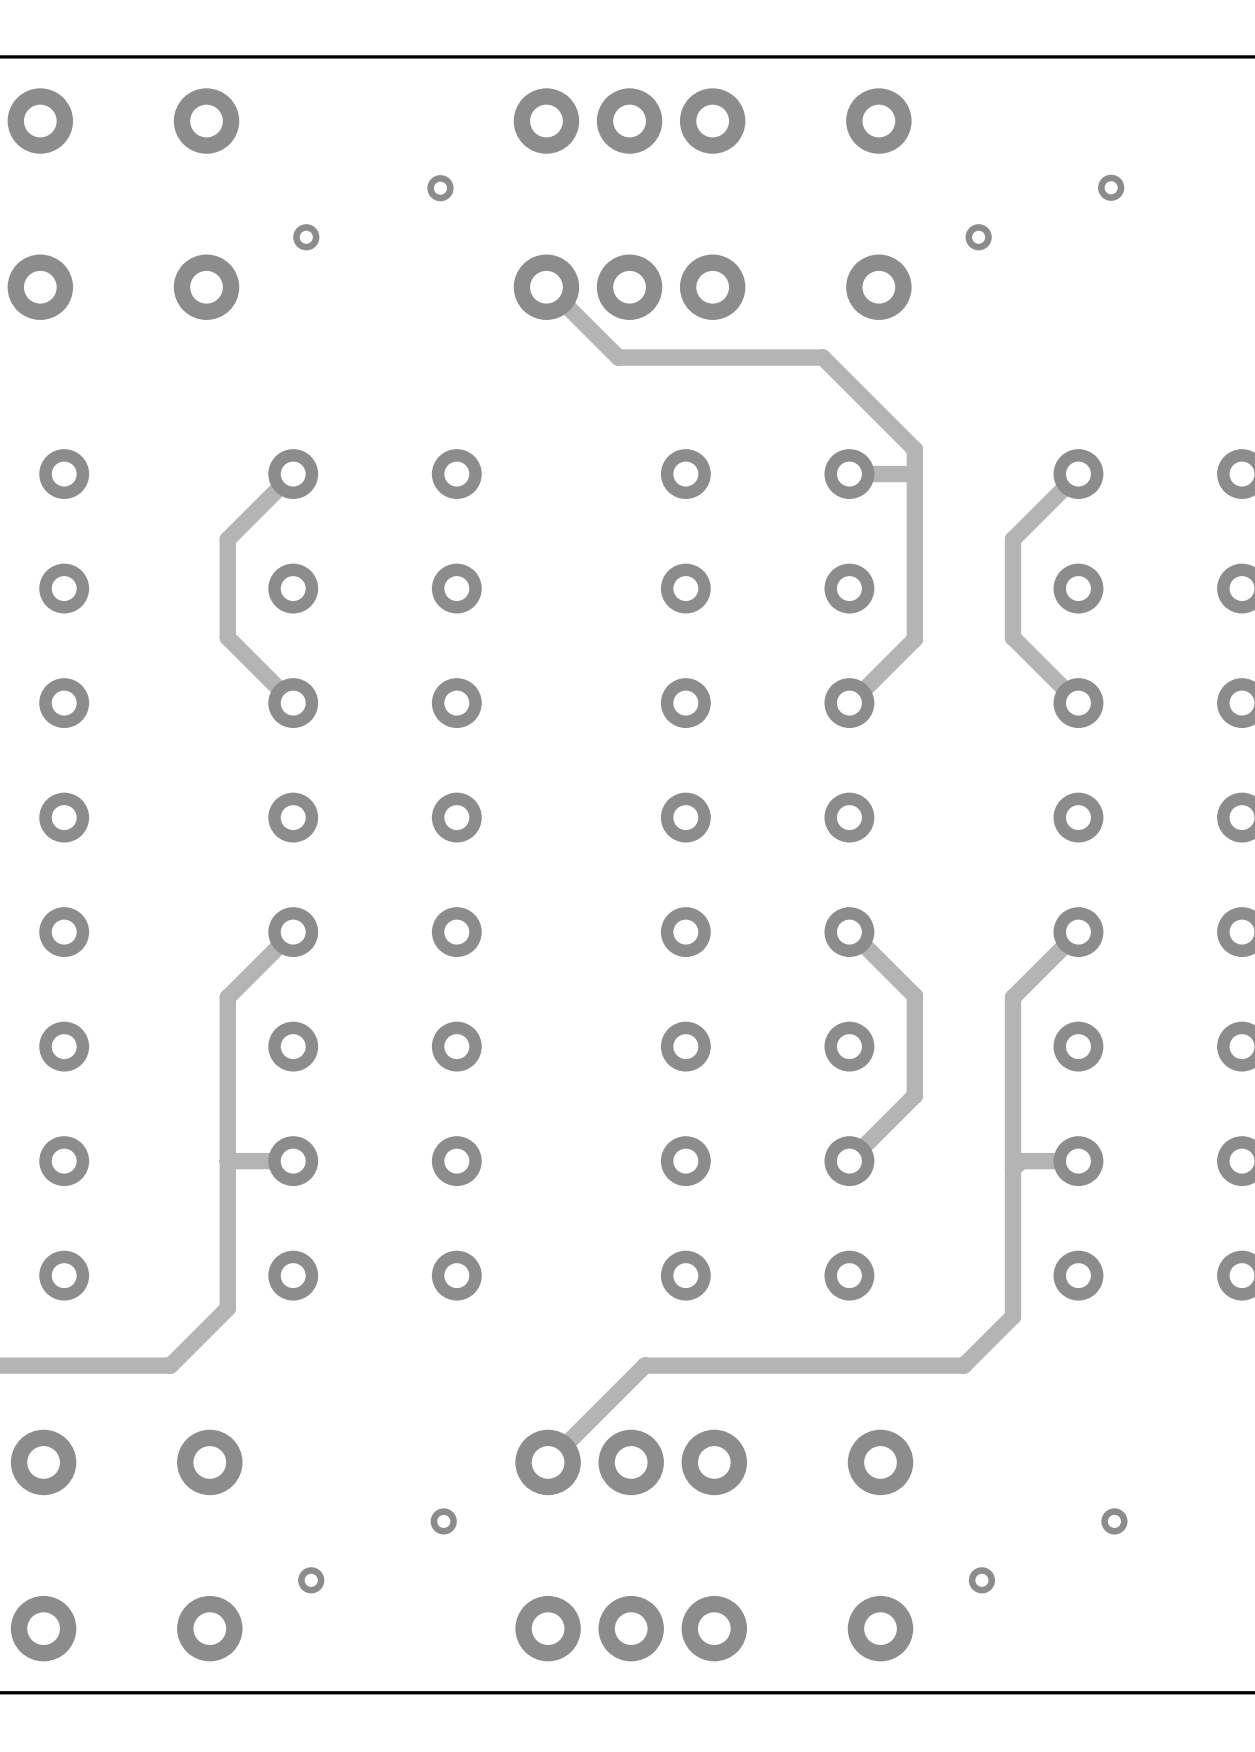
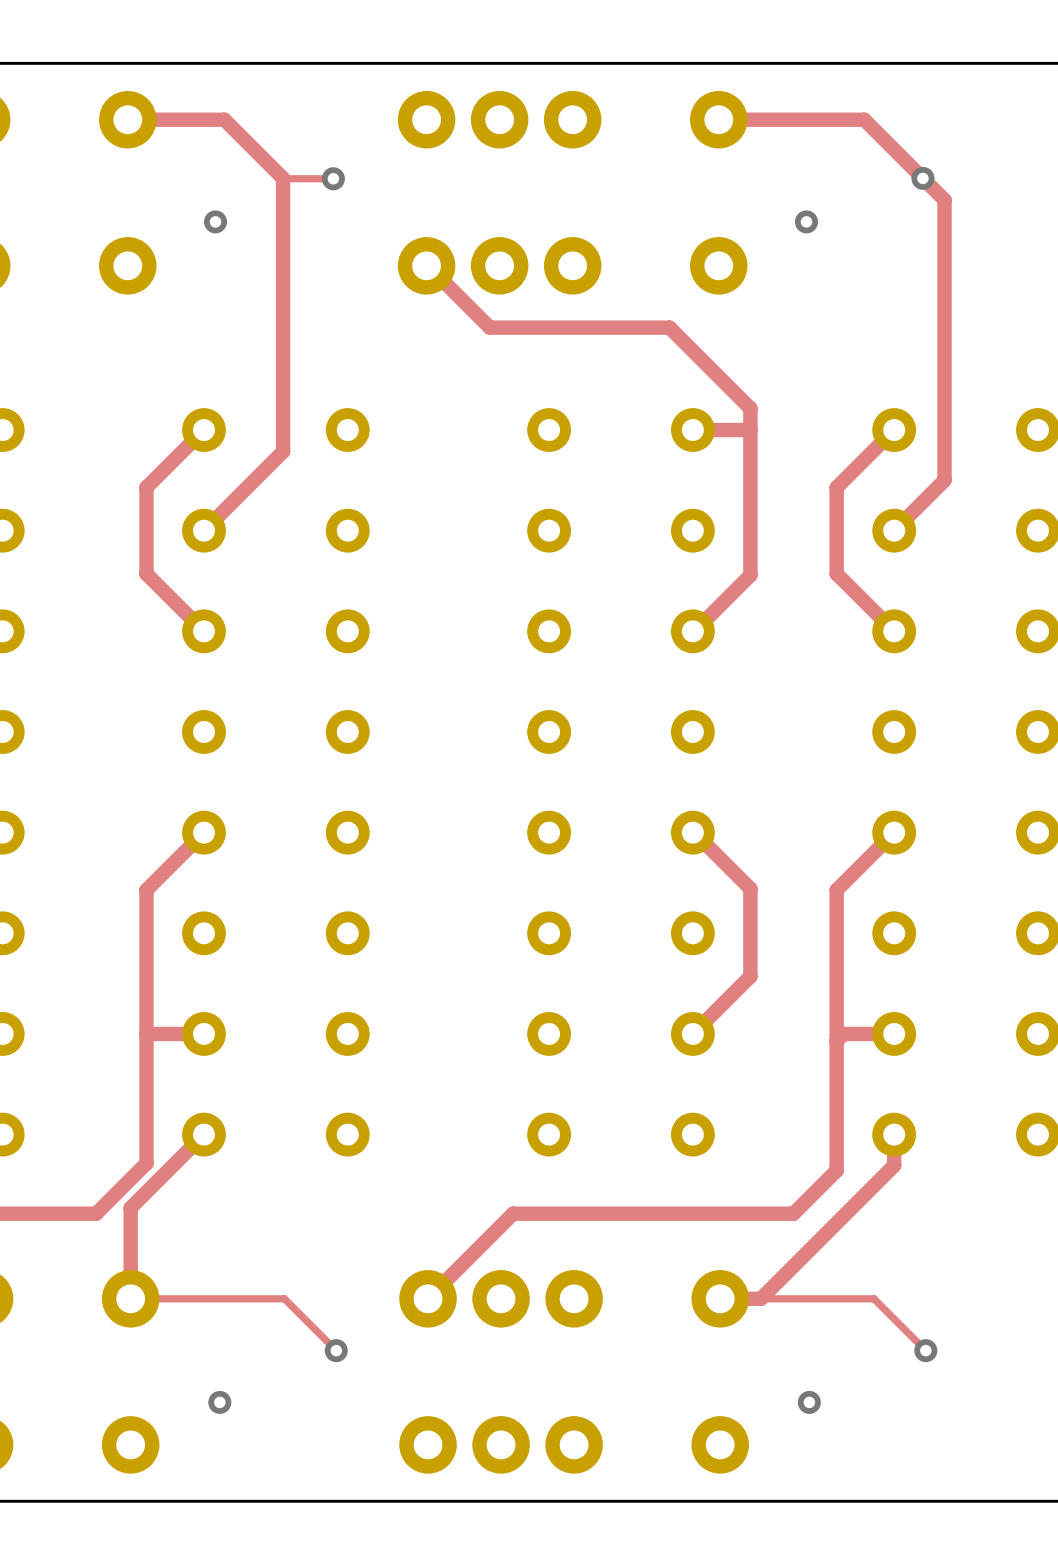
track: none -> (127, 119) (224, 119) (283, 178) (283, 451) (204, 530)
track: none -> (718, 119) (864, 119) (944, 199) (944, 480) (894, 530)
track: none -> (283, 178) (333, 178)
track: none -> (204, 1134) (130, 1207) (130, 1298) (284, 1298) (336, 1350)
track: none -> (894, 1134) (894, 1165) (760, 1298) (720, 1298) (873, 1298) (925, 1350)

